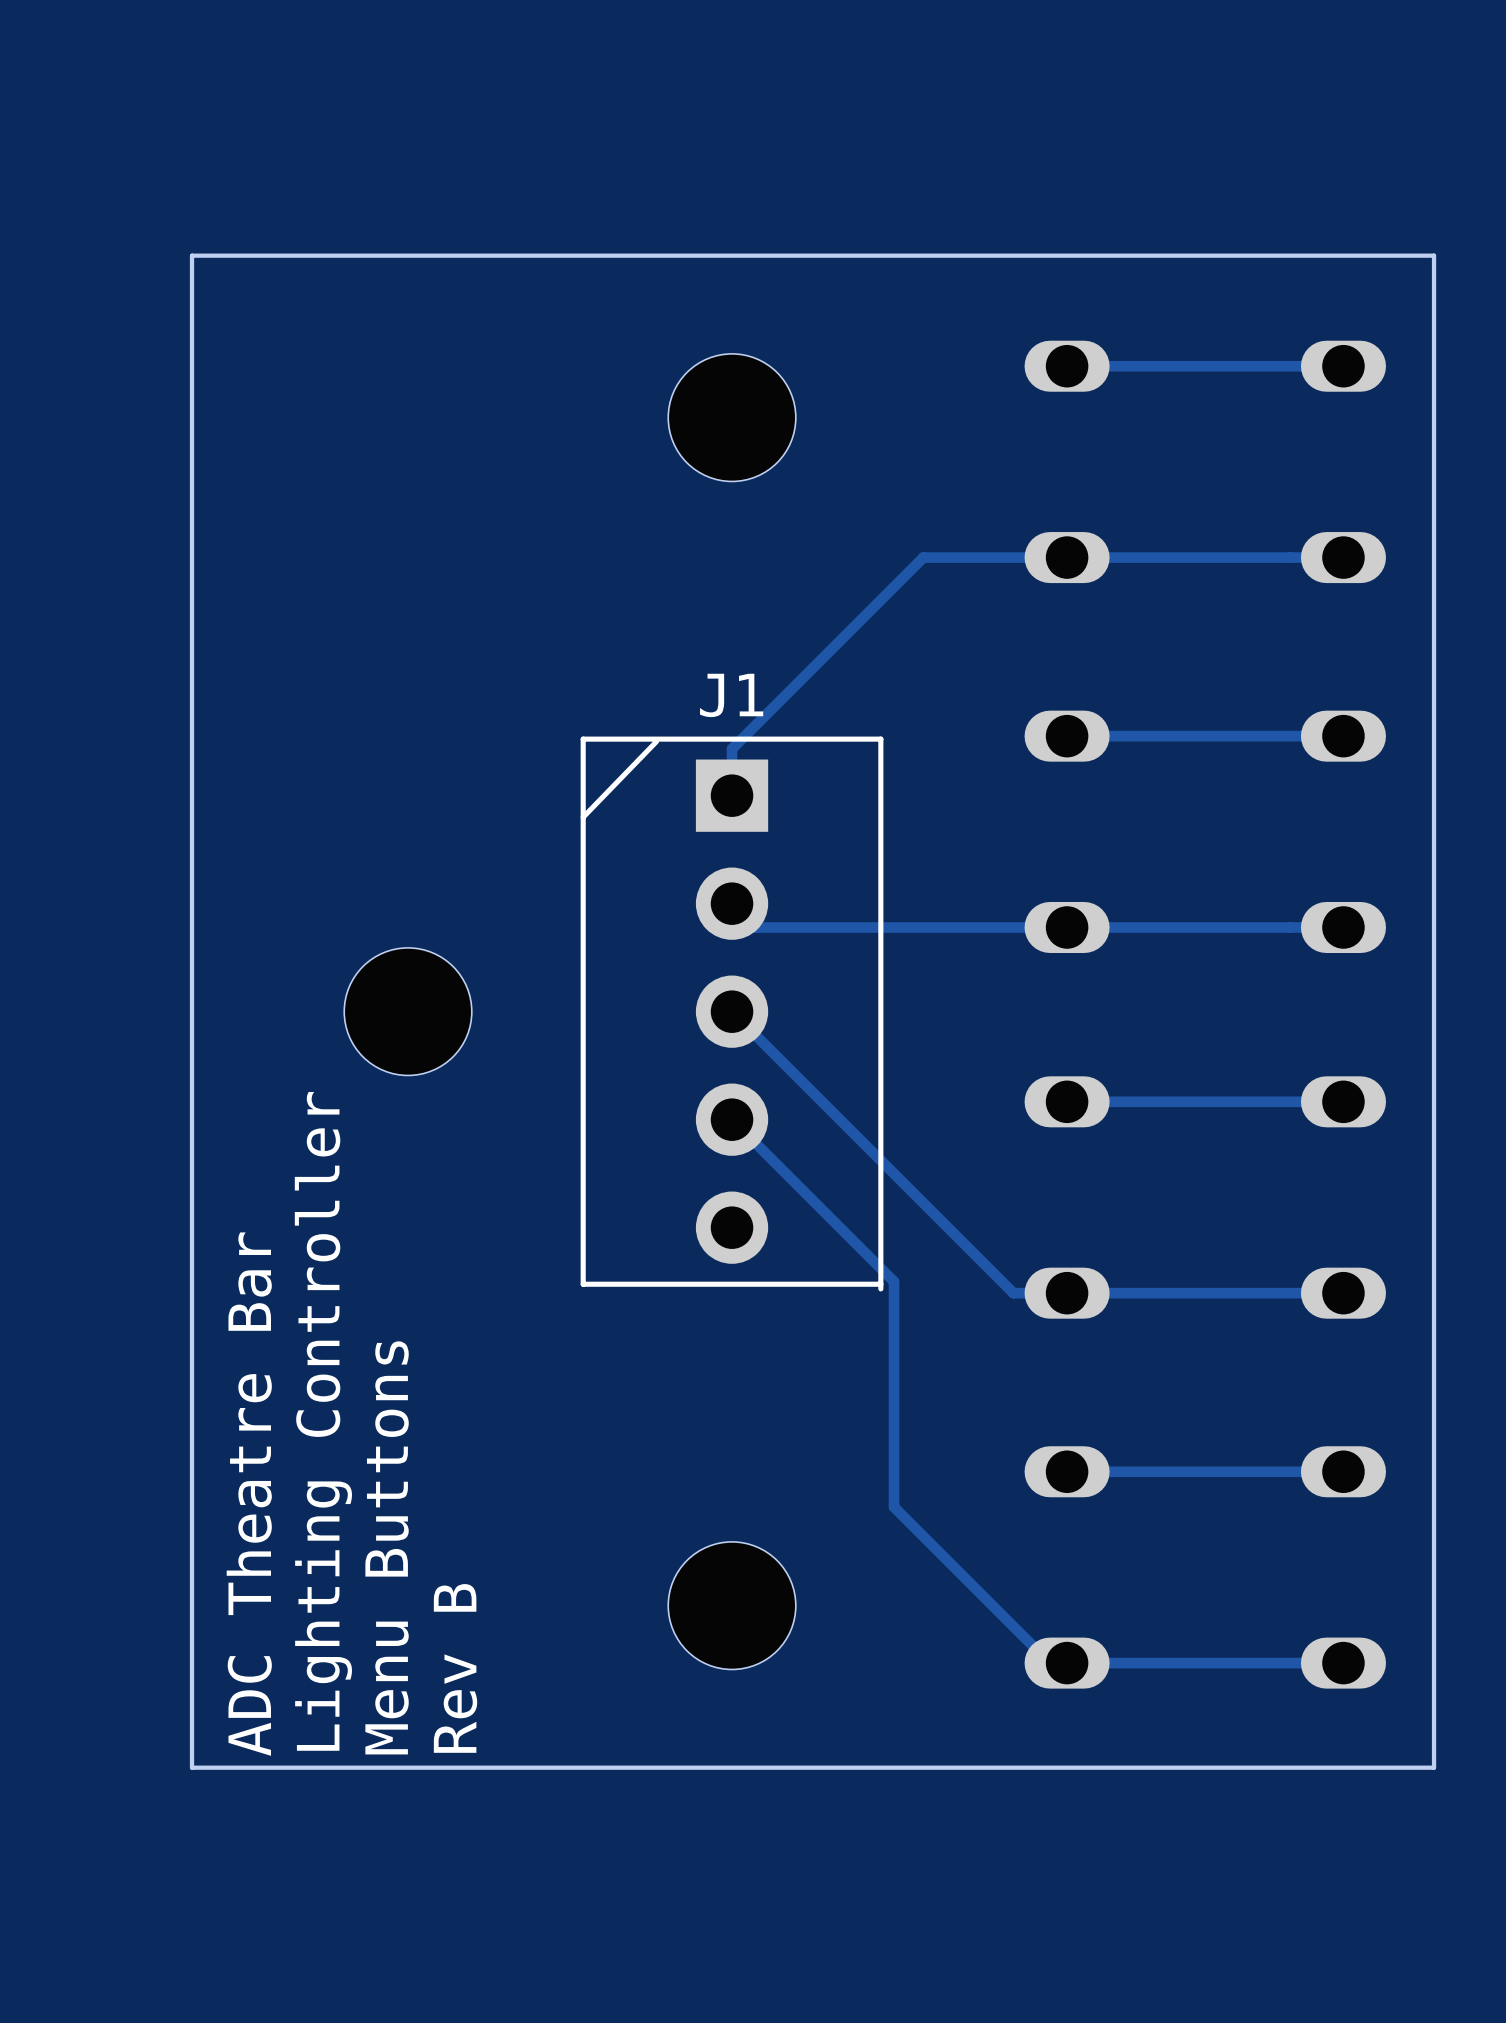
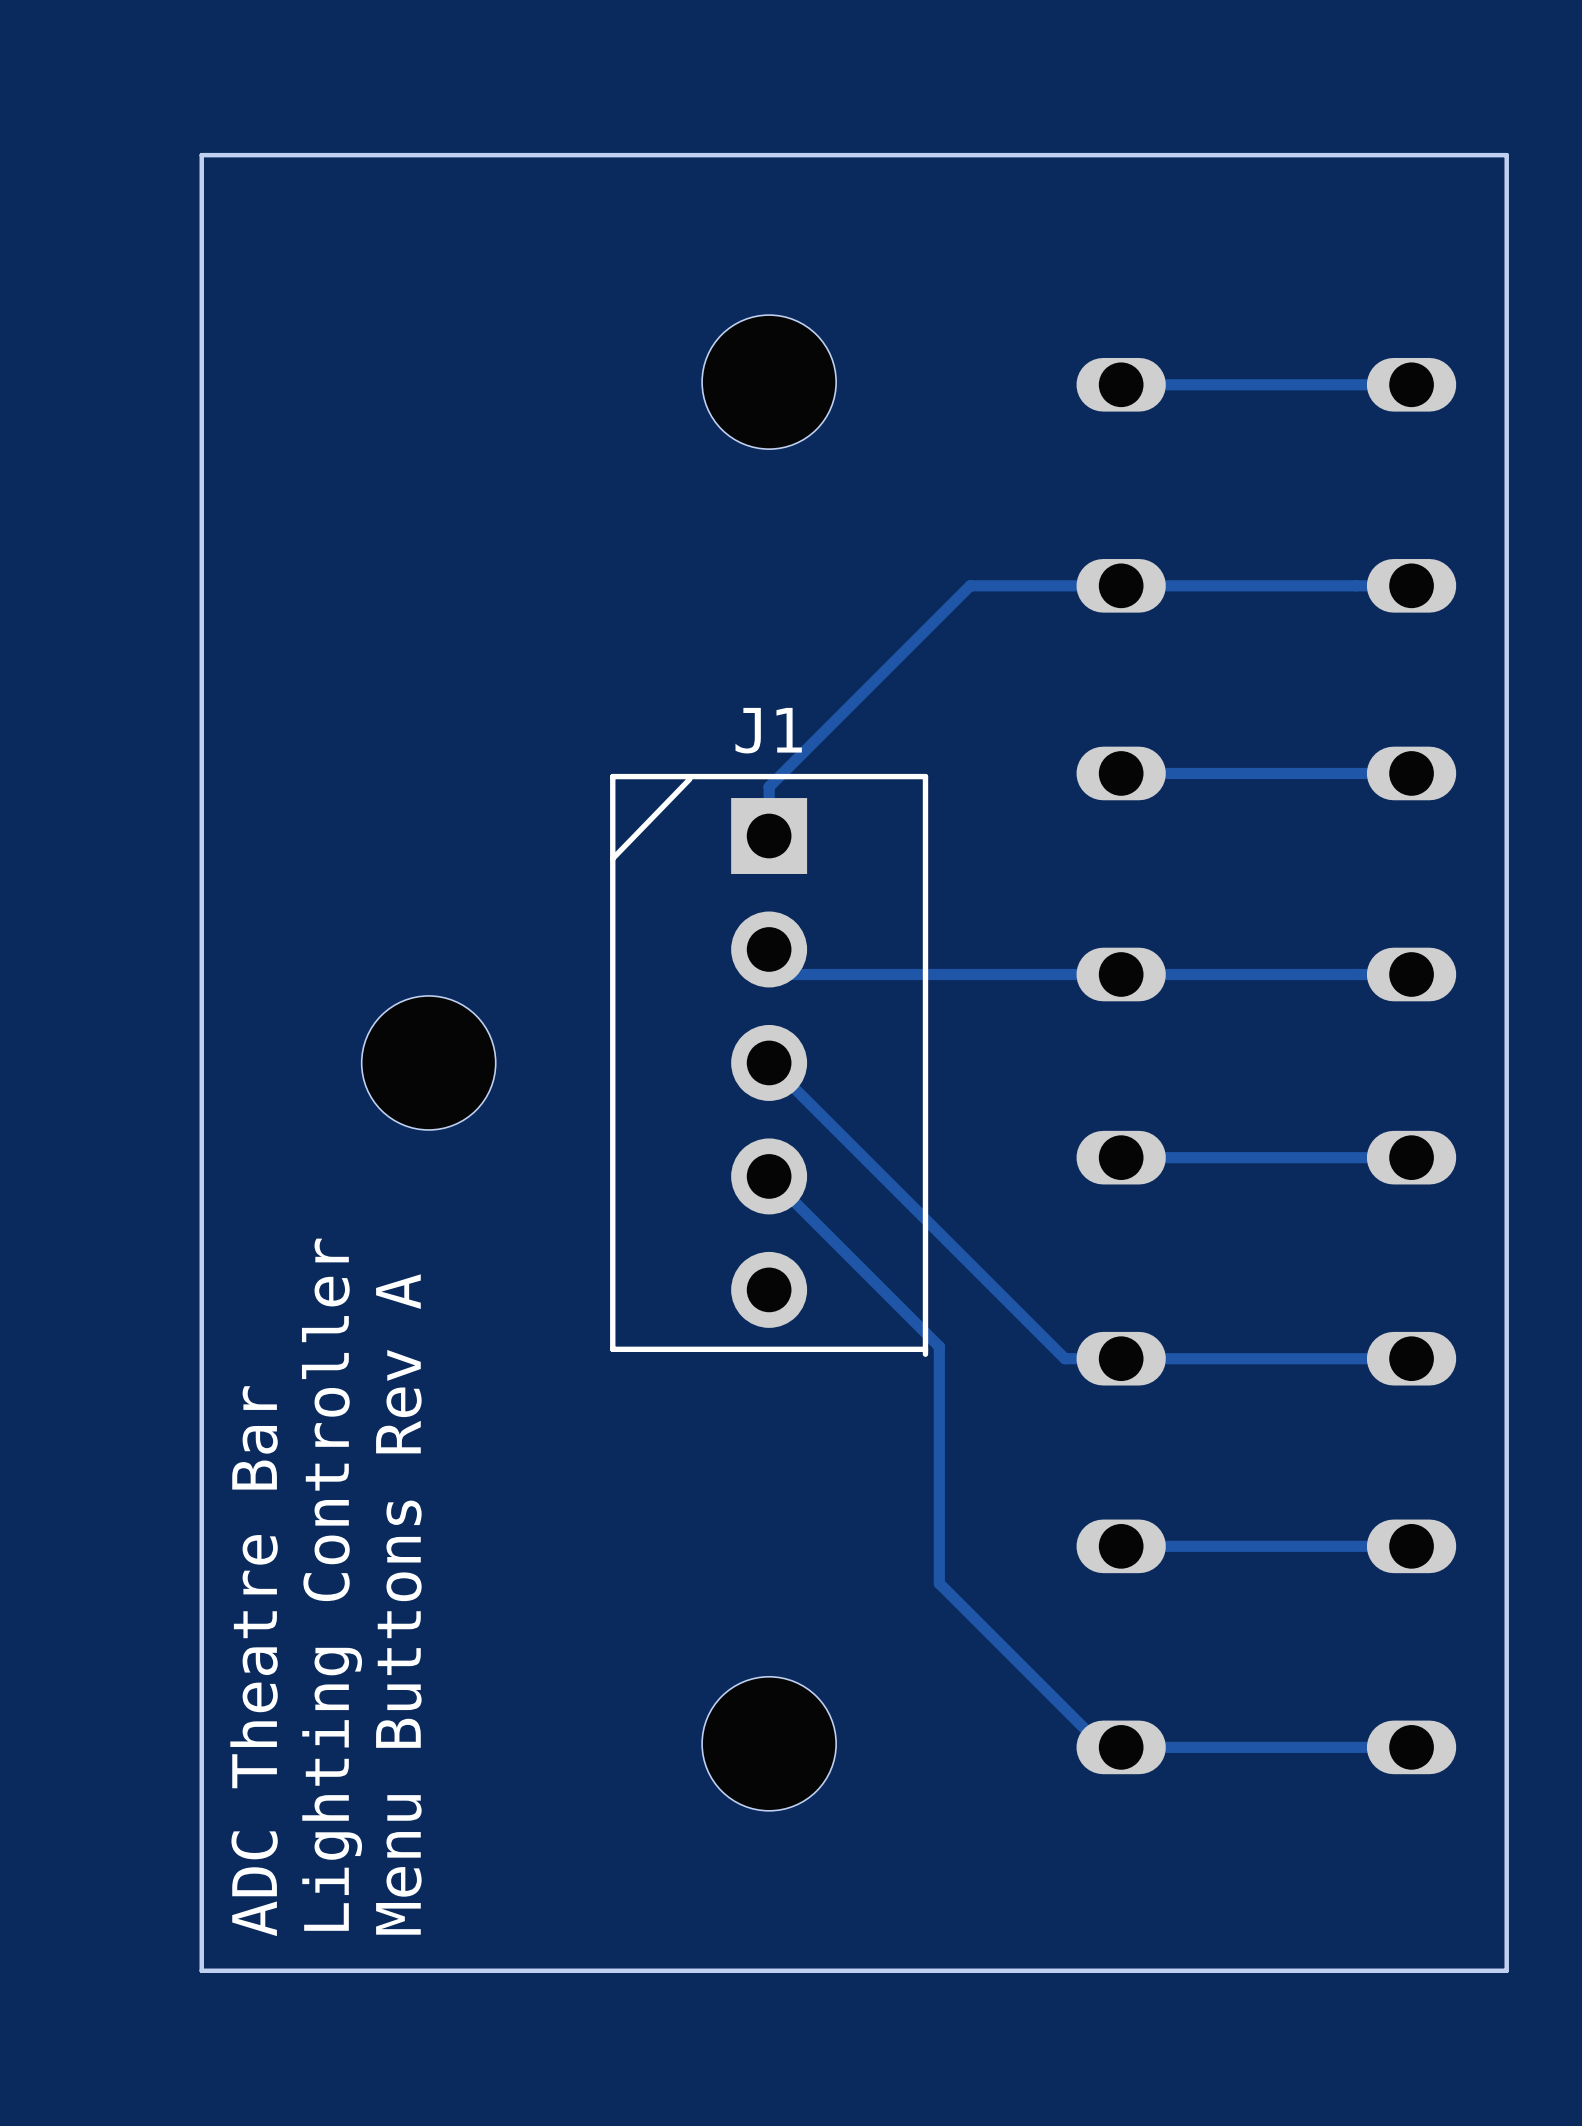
board edge: (1434, 255) (192, 255) -> (1506, 268) (1506, 155) (201, 155) (201, 268)
part position: (732, 417) -> (769, 382)
text position: Lighting Controller (323, 1421) -> Lighting Controller (331, 1584)
text position: ADC Theatre Bar (249, 1494) -> ADC Theatre Bar (254, 1661)
text: Menu Buttons (387, 1547) -> Menu Buttons Rev A (398, 1604)
part position: (732, 1605) -> (769, 1743)
text: Rev B (455, 1668) -> none
board edge: (1434, 1767) (192, 1767) -> (1506, 1857) (1506, 1970) (201, 1970) (201, 1857)

